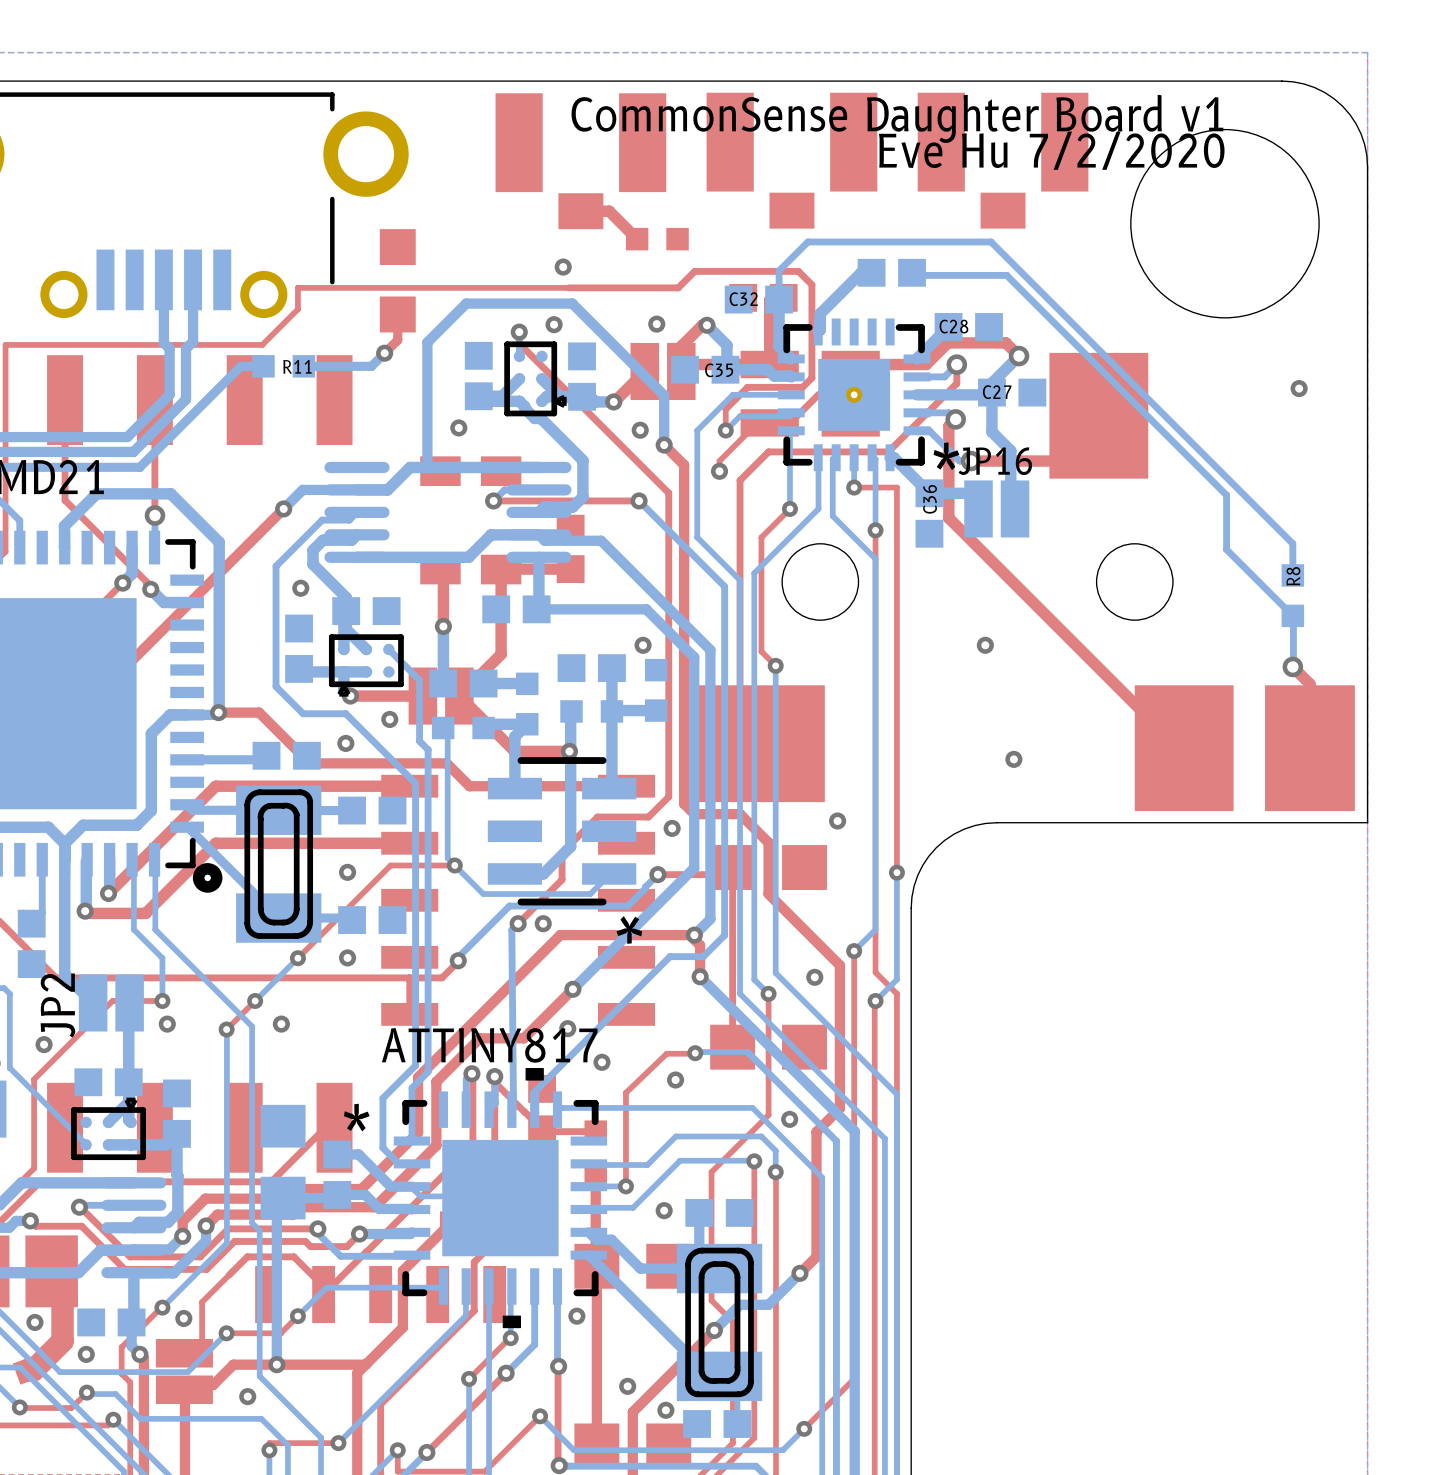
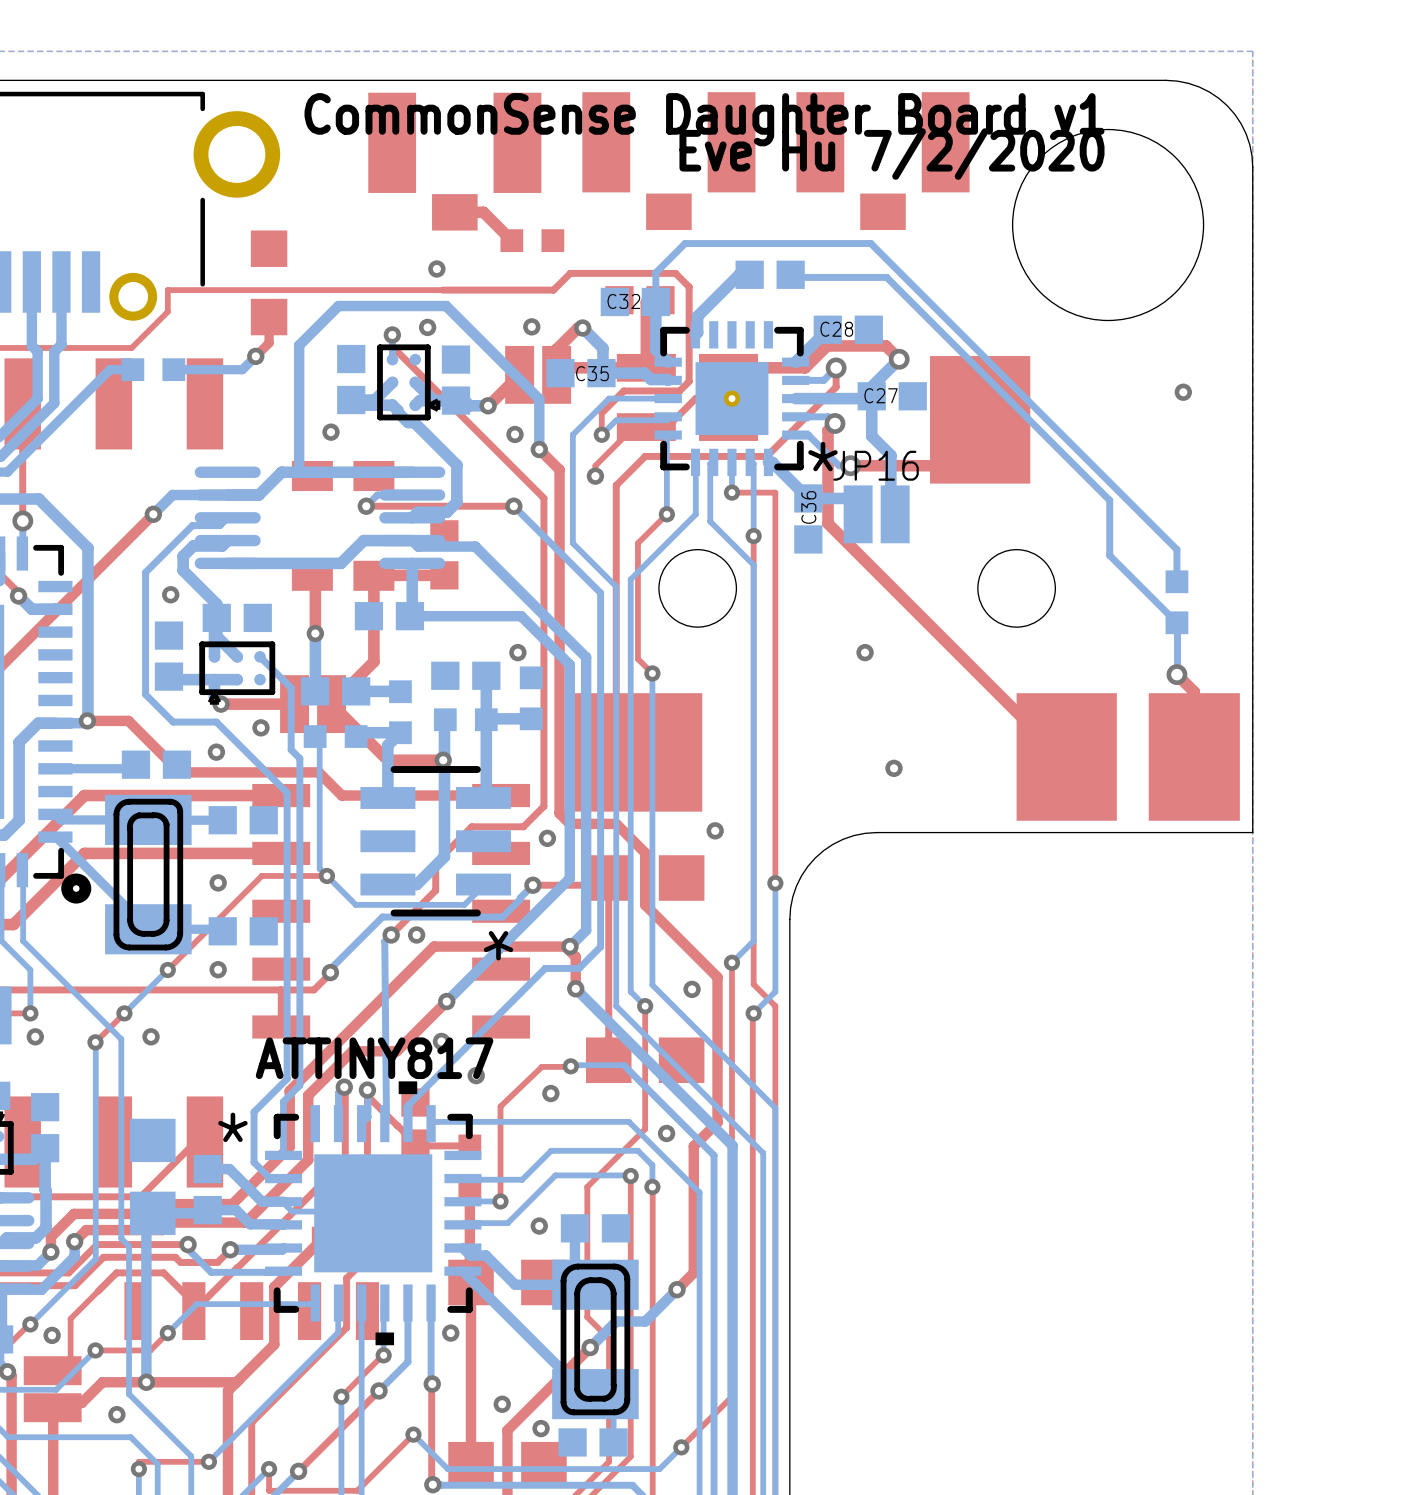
R11 name: R11 (297, 366) -> none
R8 name: R8 (1293, 576) -> none

